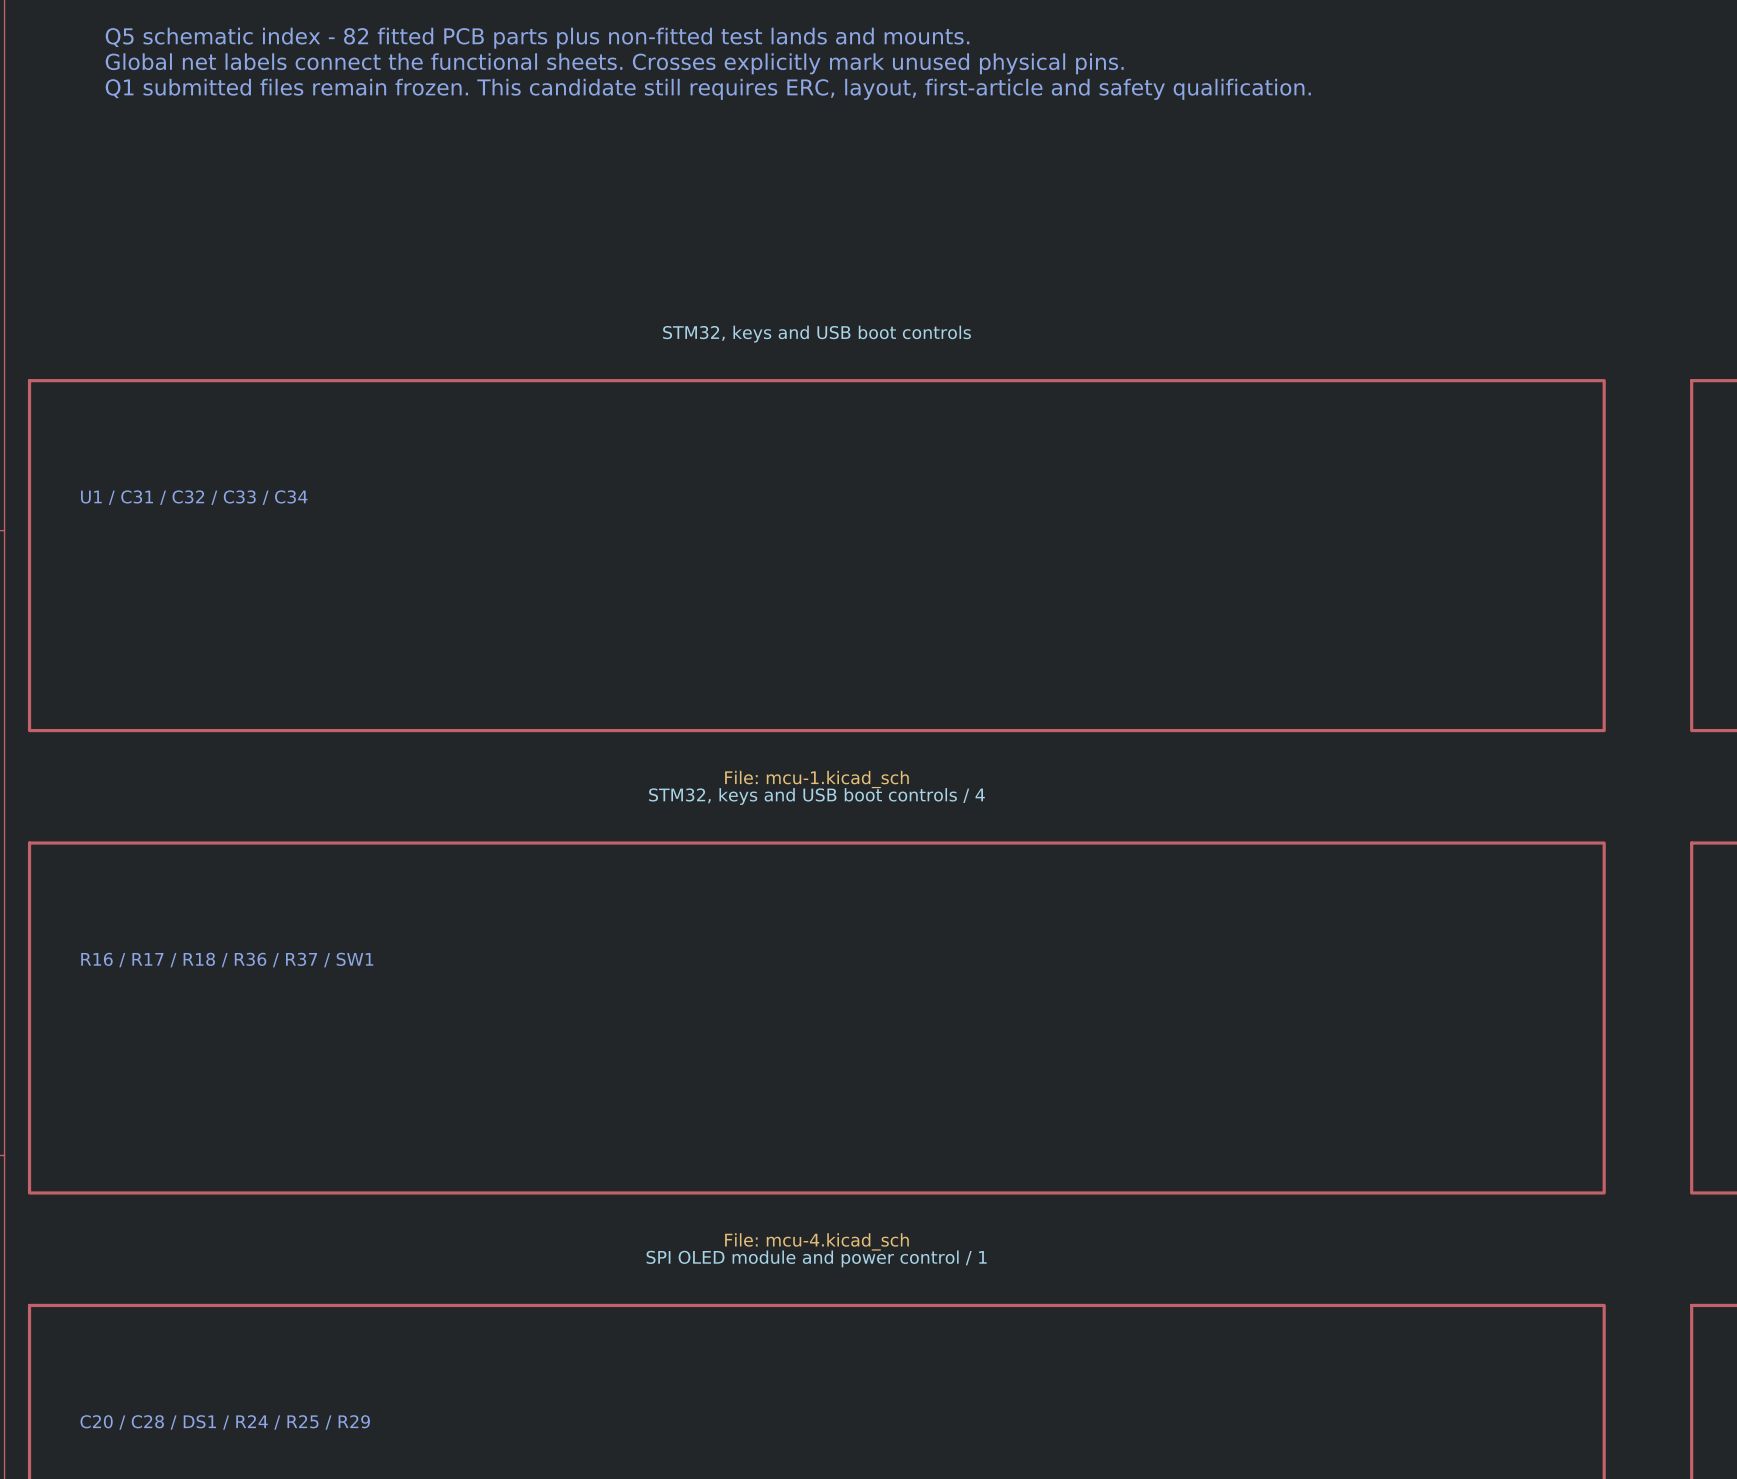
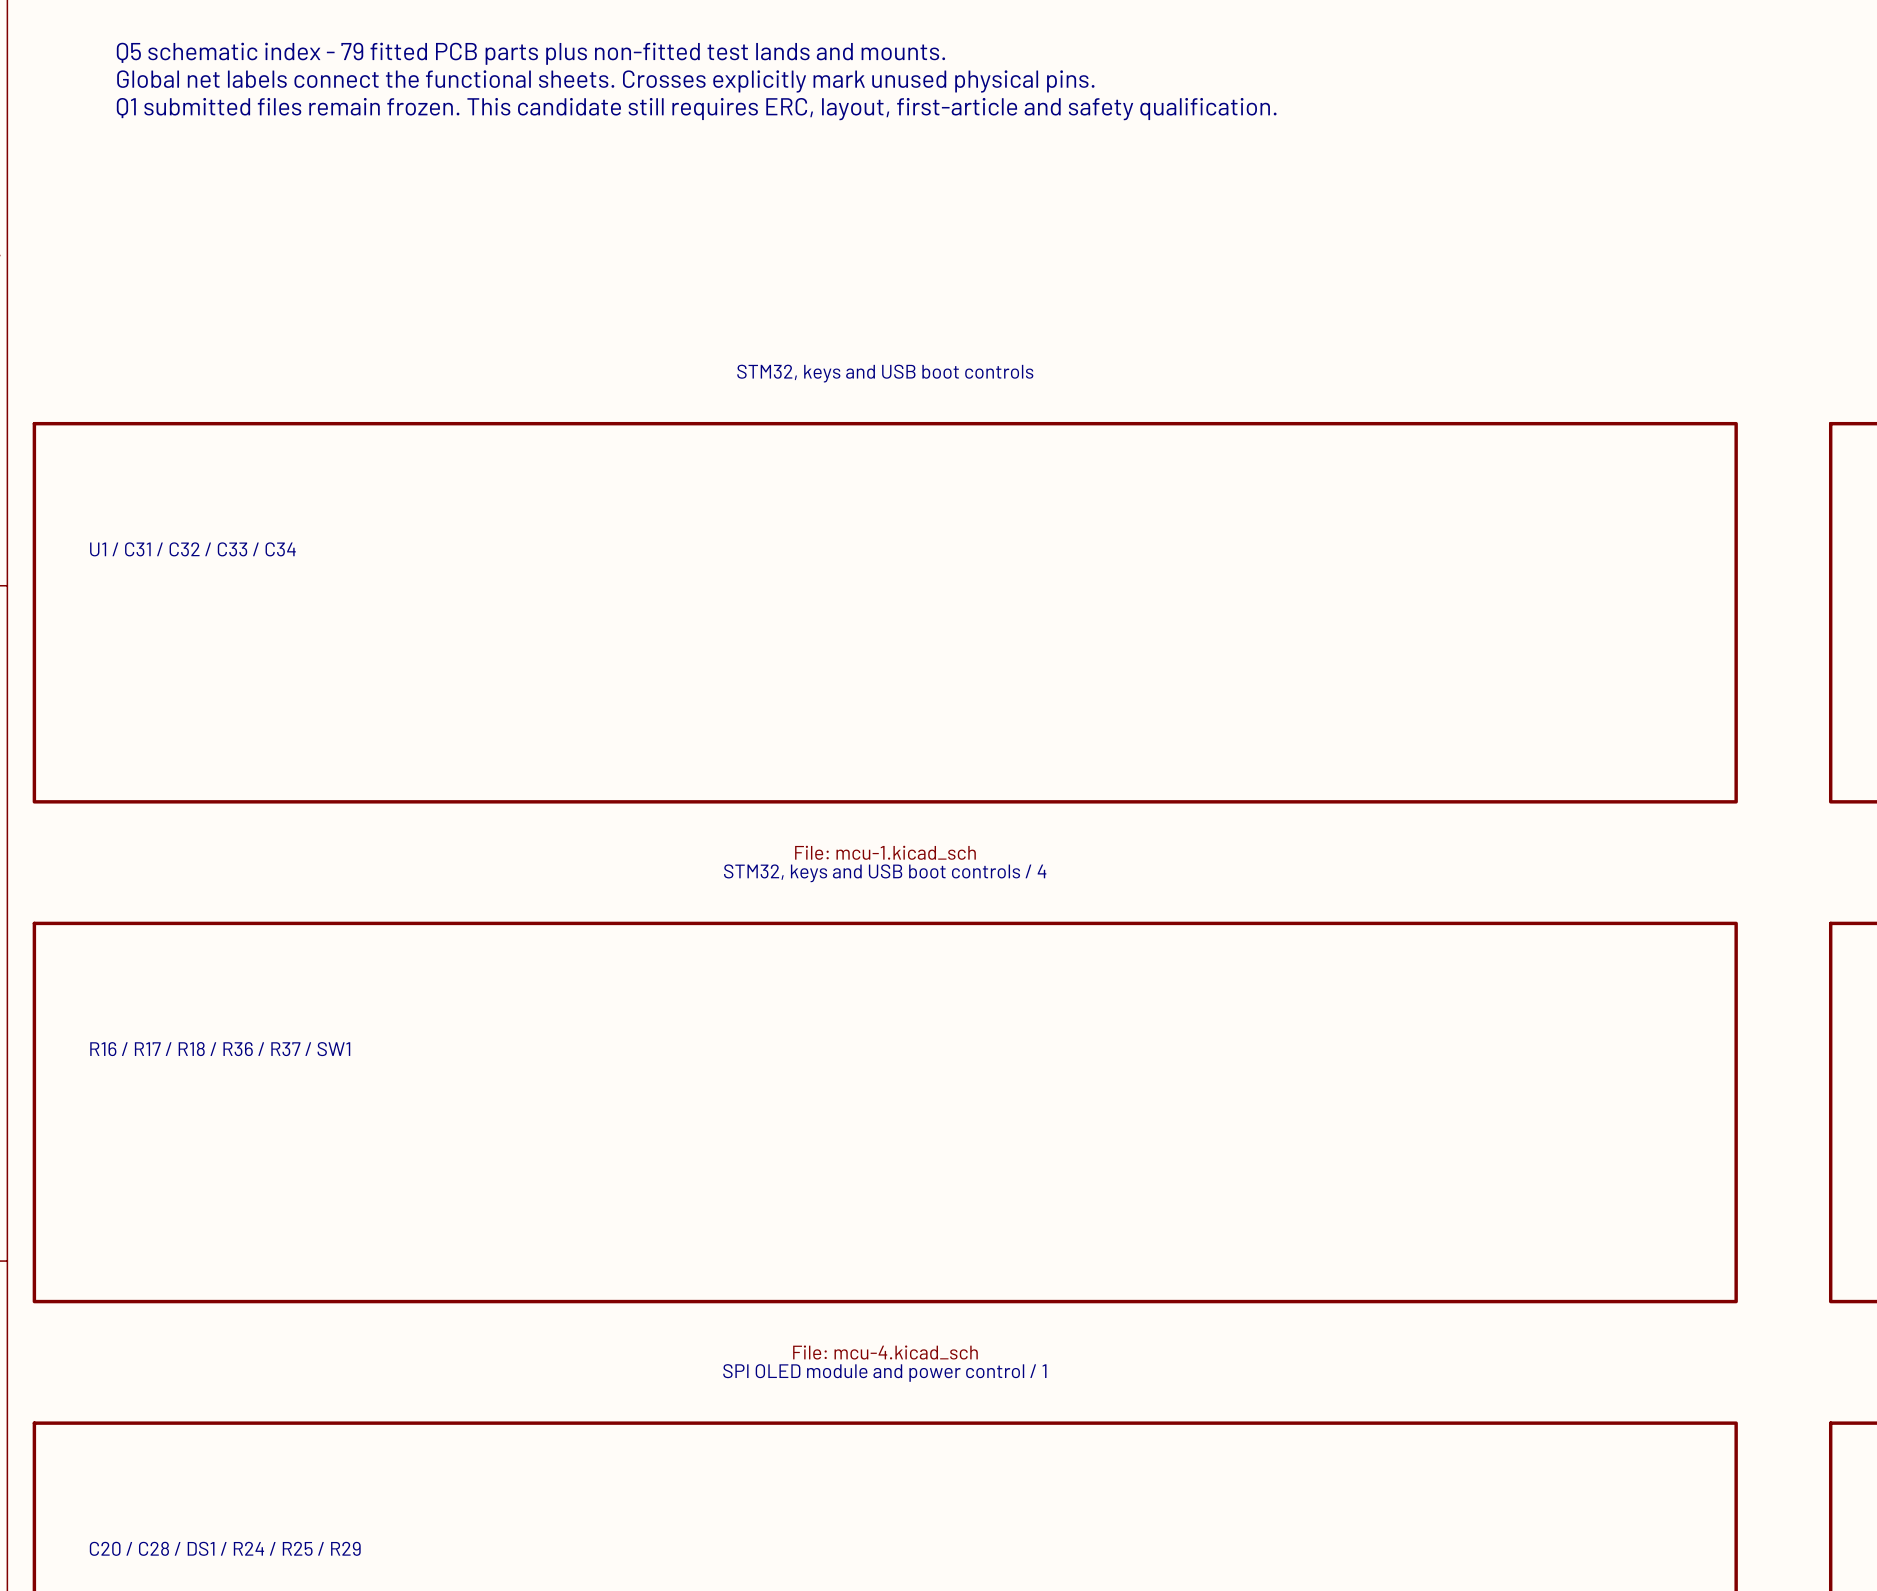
text: Q5 schematic index - 82 fitted PCB parts plus non-fitted test lands and mounts. (537, 38) -> Q5 schematic index - 79 fitted PCB parts plus non-fitted test lands and mounts. (530, 53)

